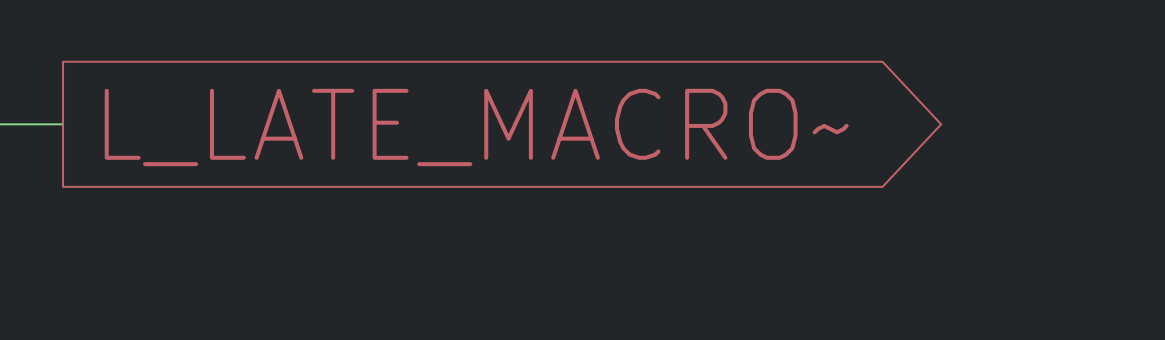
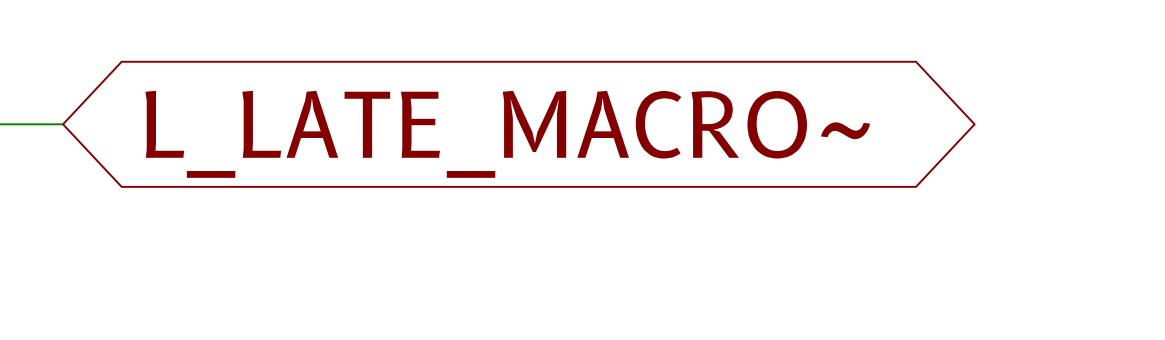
global label shape: output (476, 127) -> bidirectional (507, 134)

